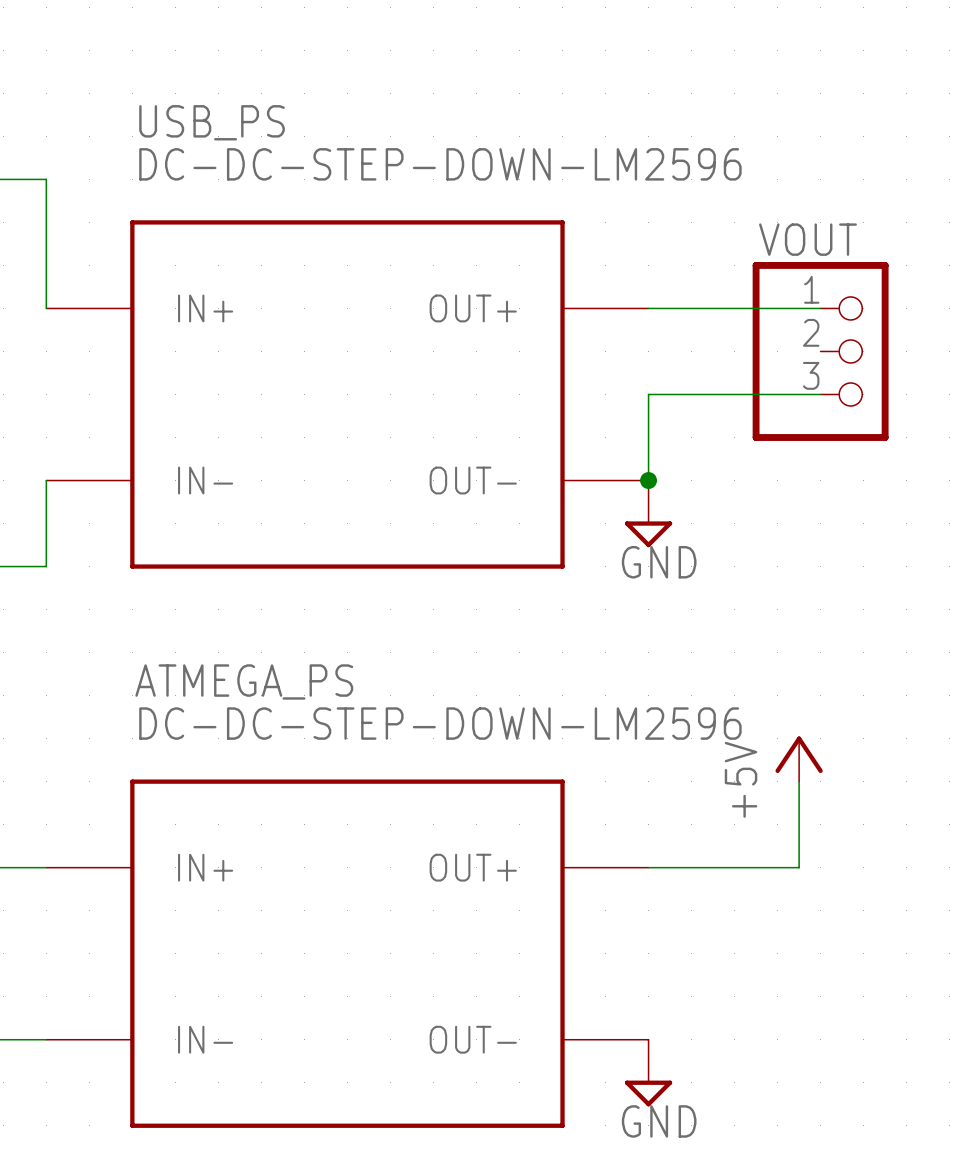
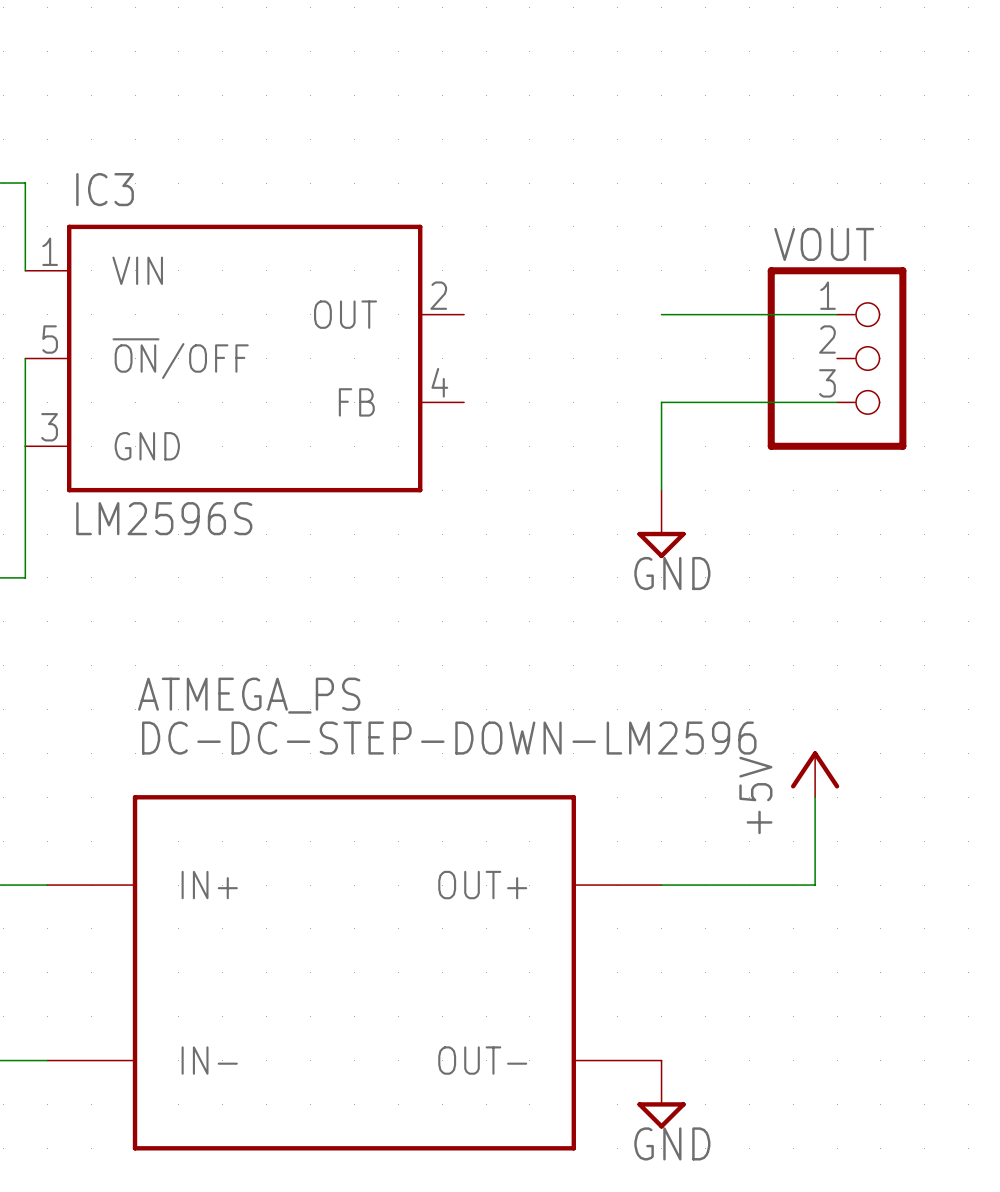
wire: (24, 179) (46, 179) (46, 308) -> (25, 183) (25, 270)
IC3: none -> LM2596S (244, 358)
USB_PS: DC-DC-STEP-DOWN-LM2596 (347, 394) -> none
wire: (46, 480) (46, 566) (24, 566) -> (25, 358) (25, 577)
junction: (648, 480) -> none

